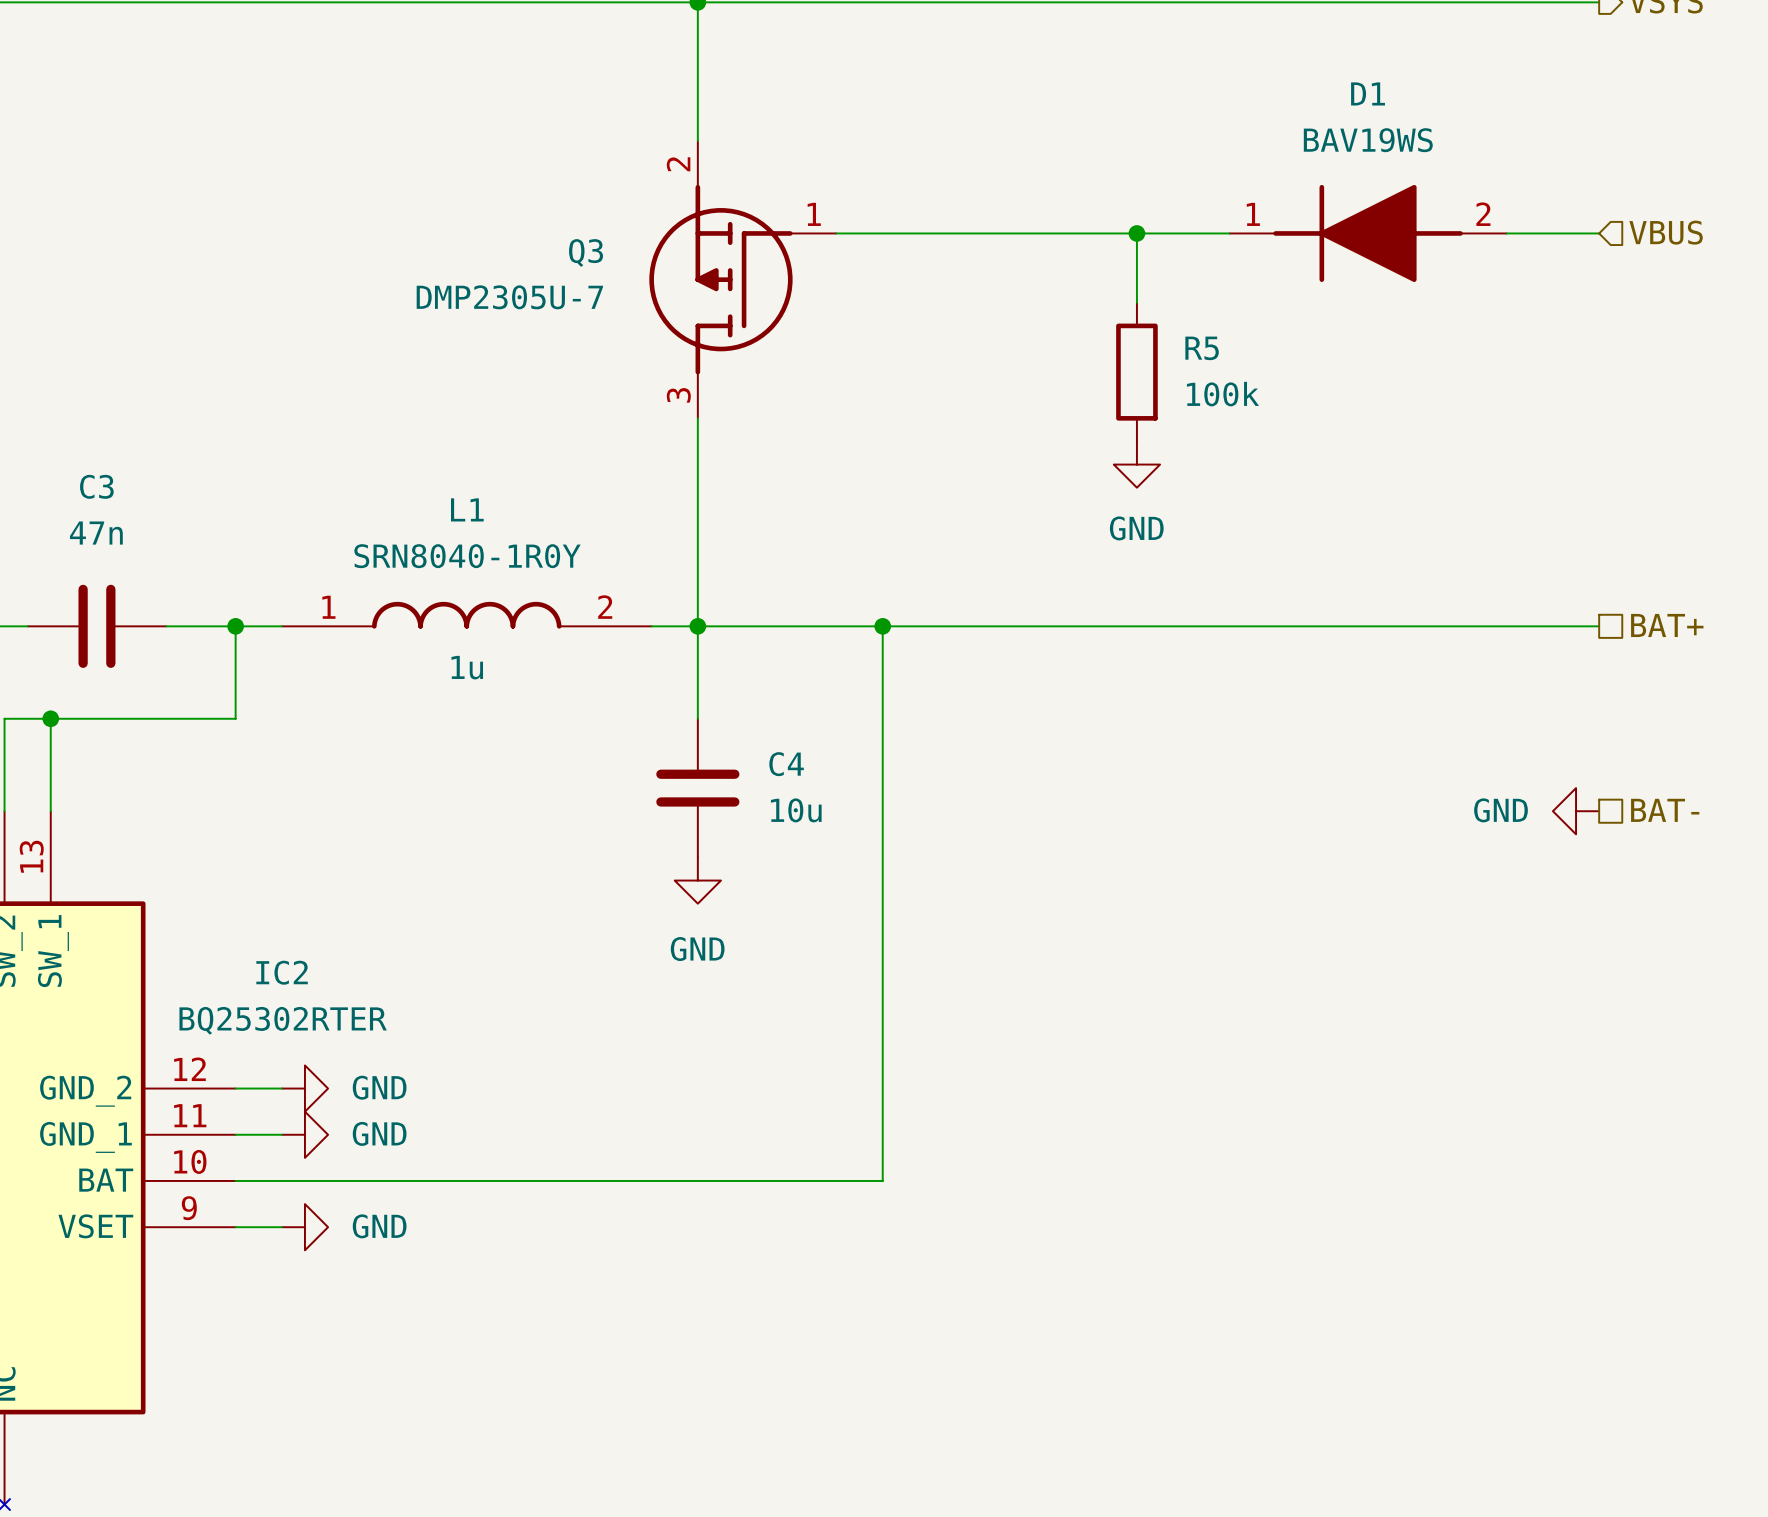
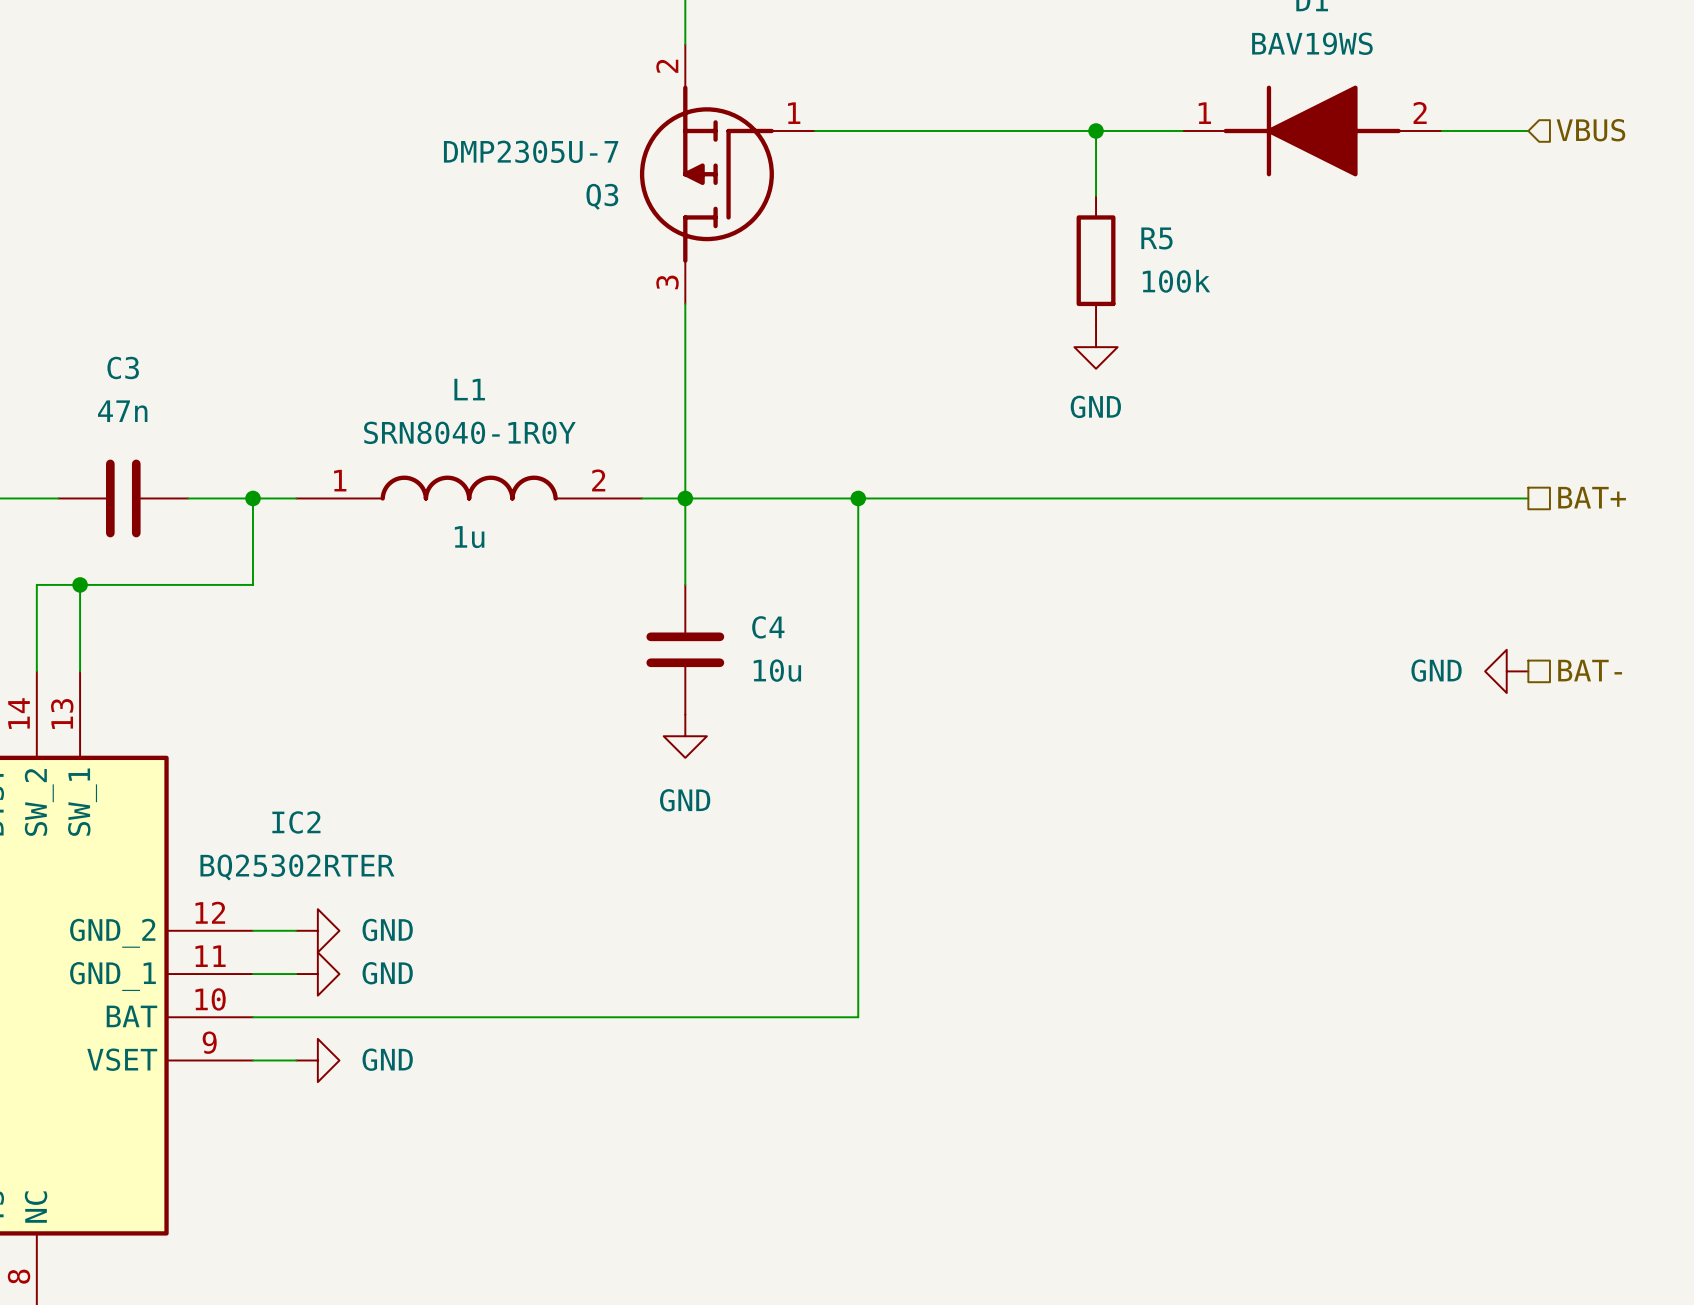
Q3 name position: Q3 (586, 252) -> Q3 (602, 196)
Q3 value position: DMP2305U-7 (509, 297) -> DMP2305U-7 (531, 151)

